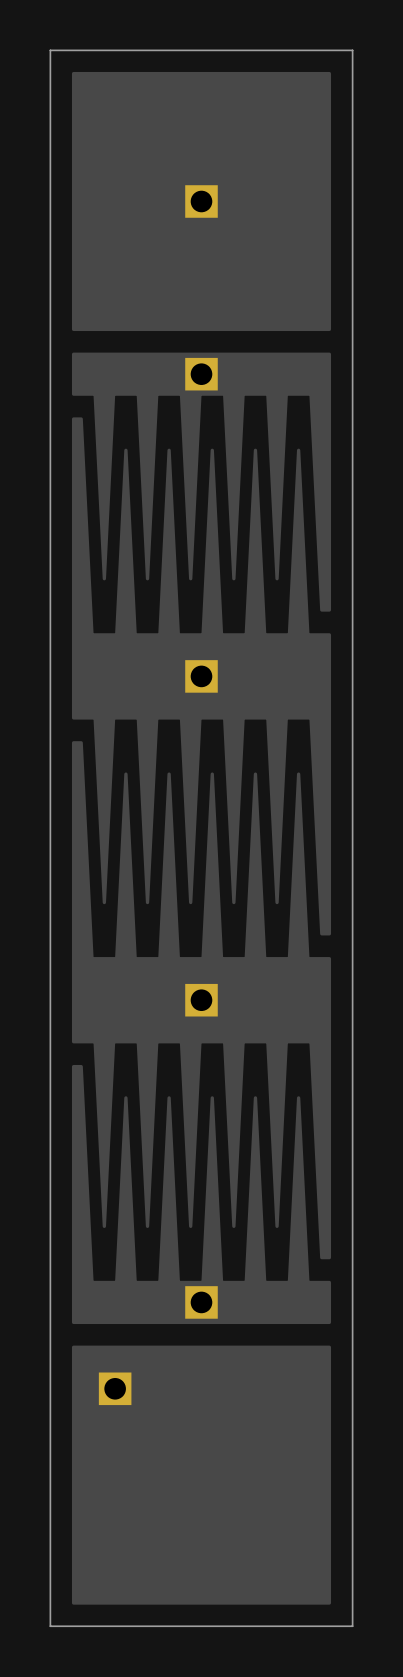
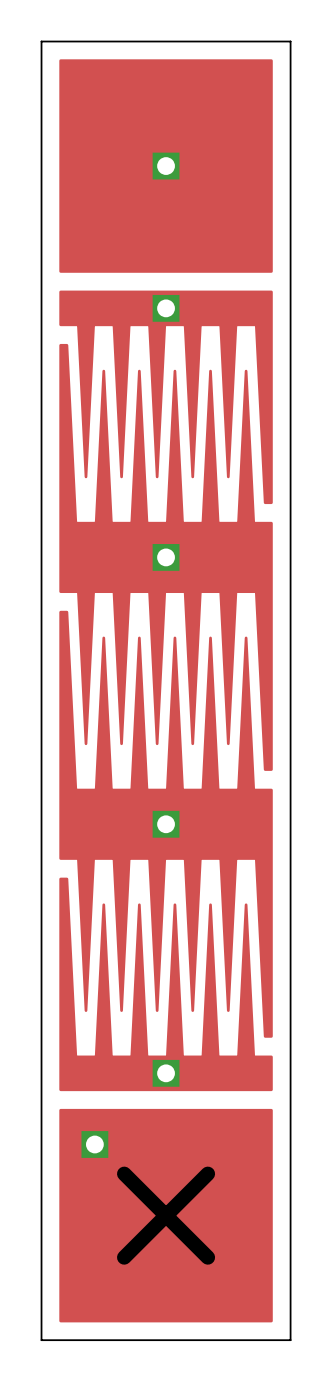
board edge: none -> (124, 1173) (207, 1257)
board edge: none -> (207, 1173) (124, 1257)

